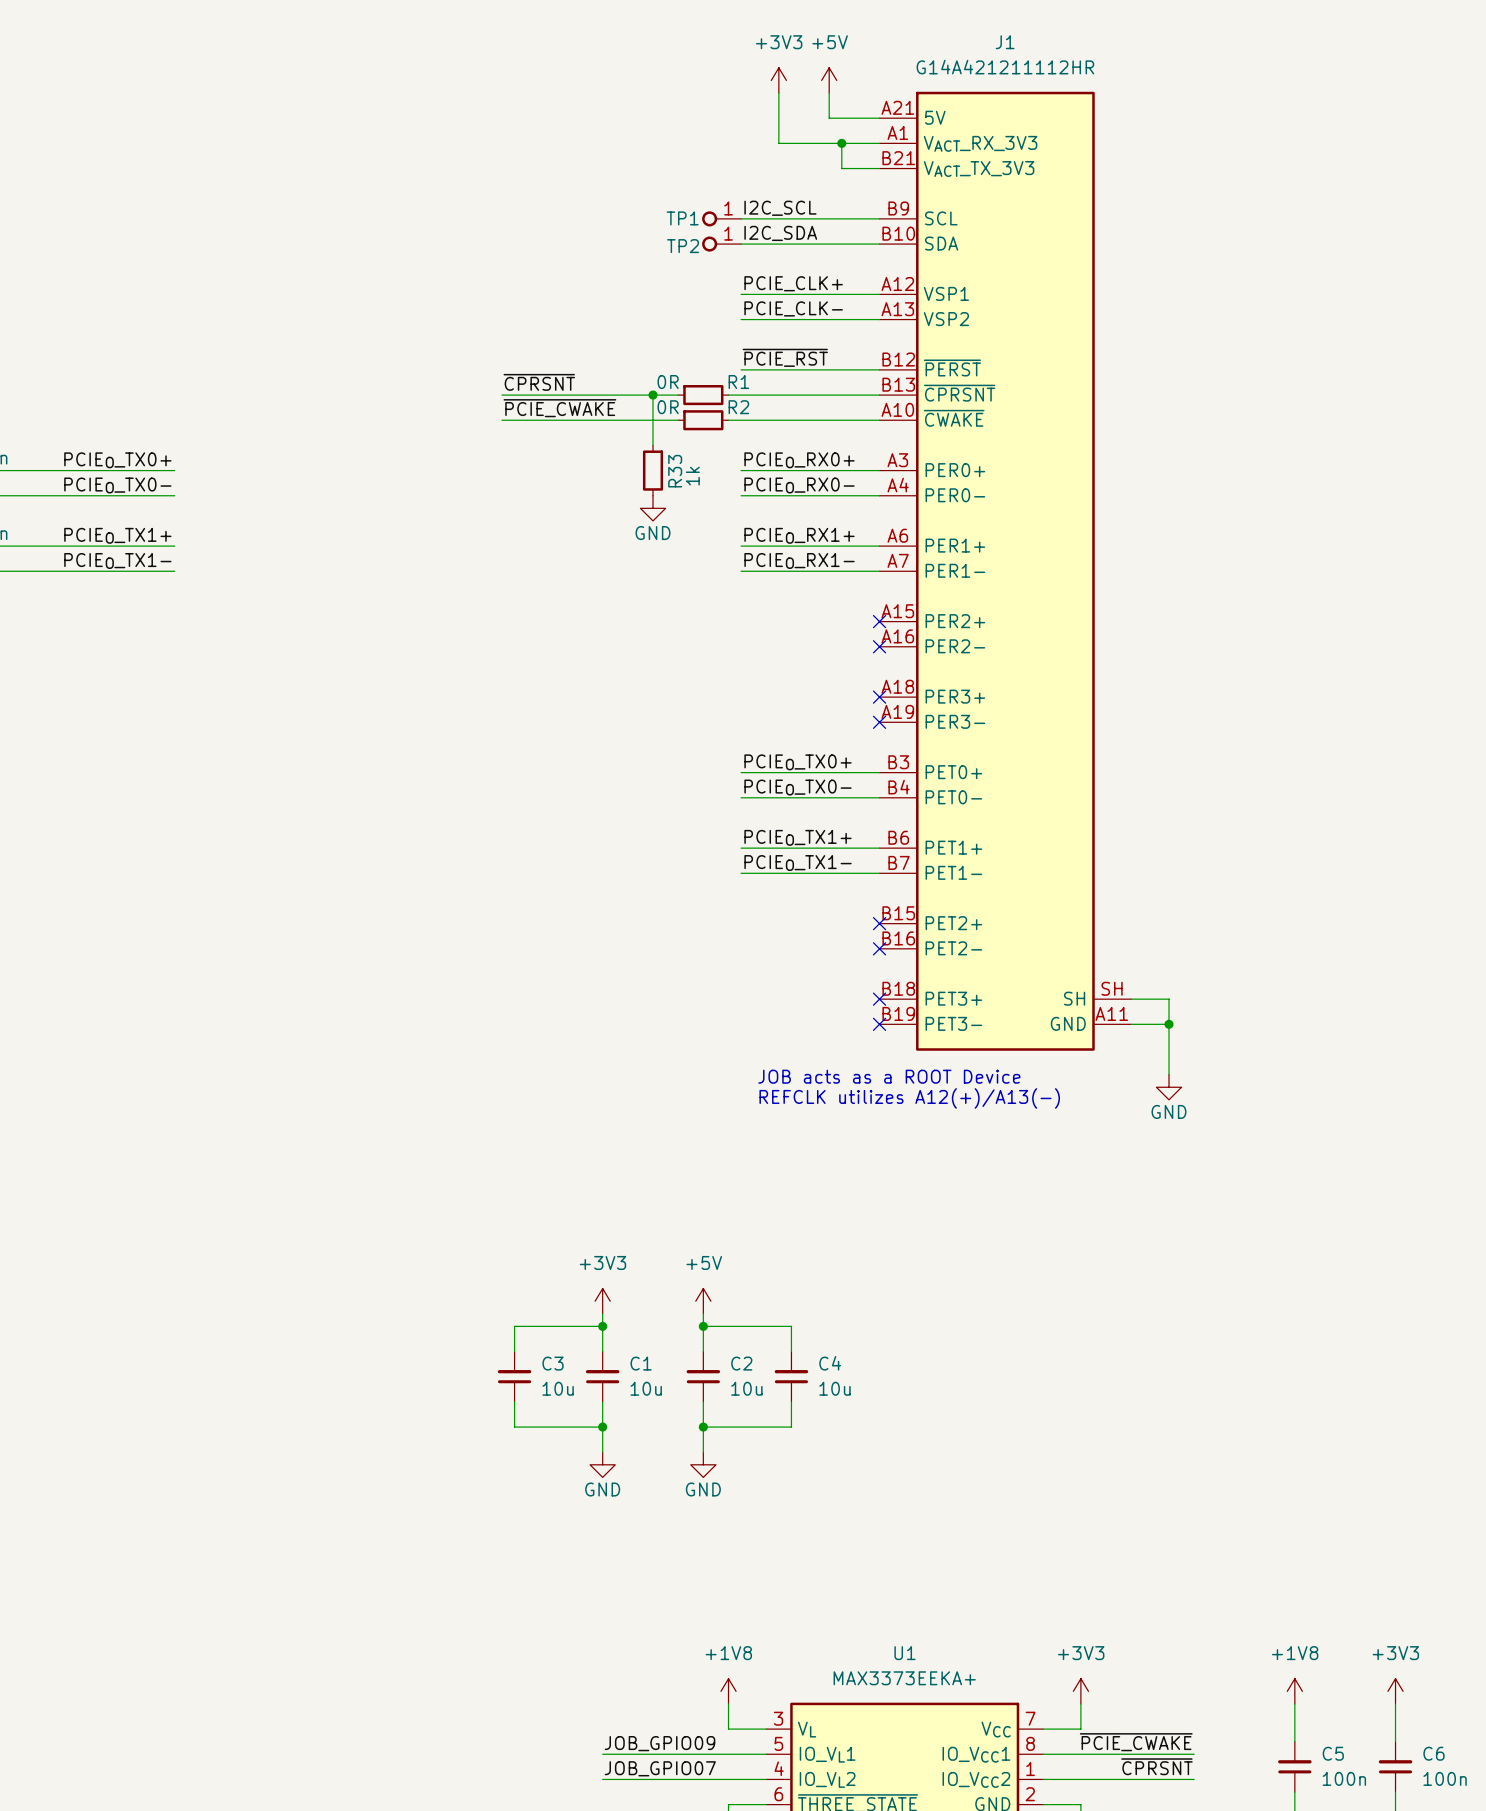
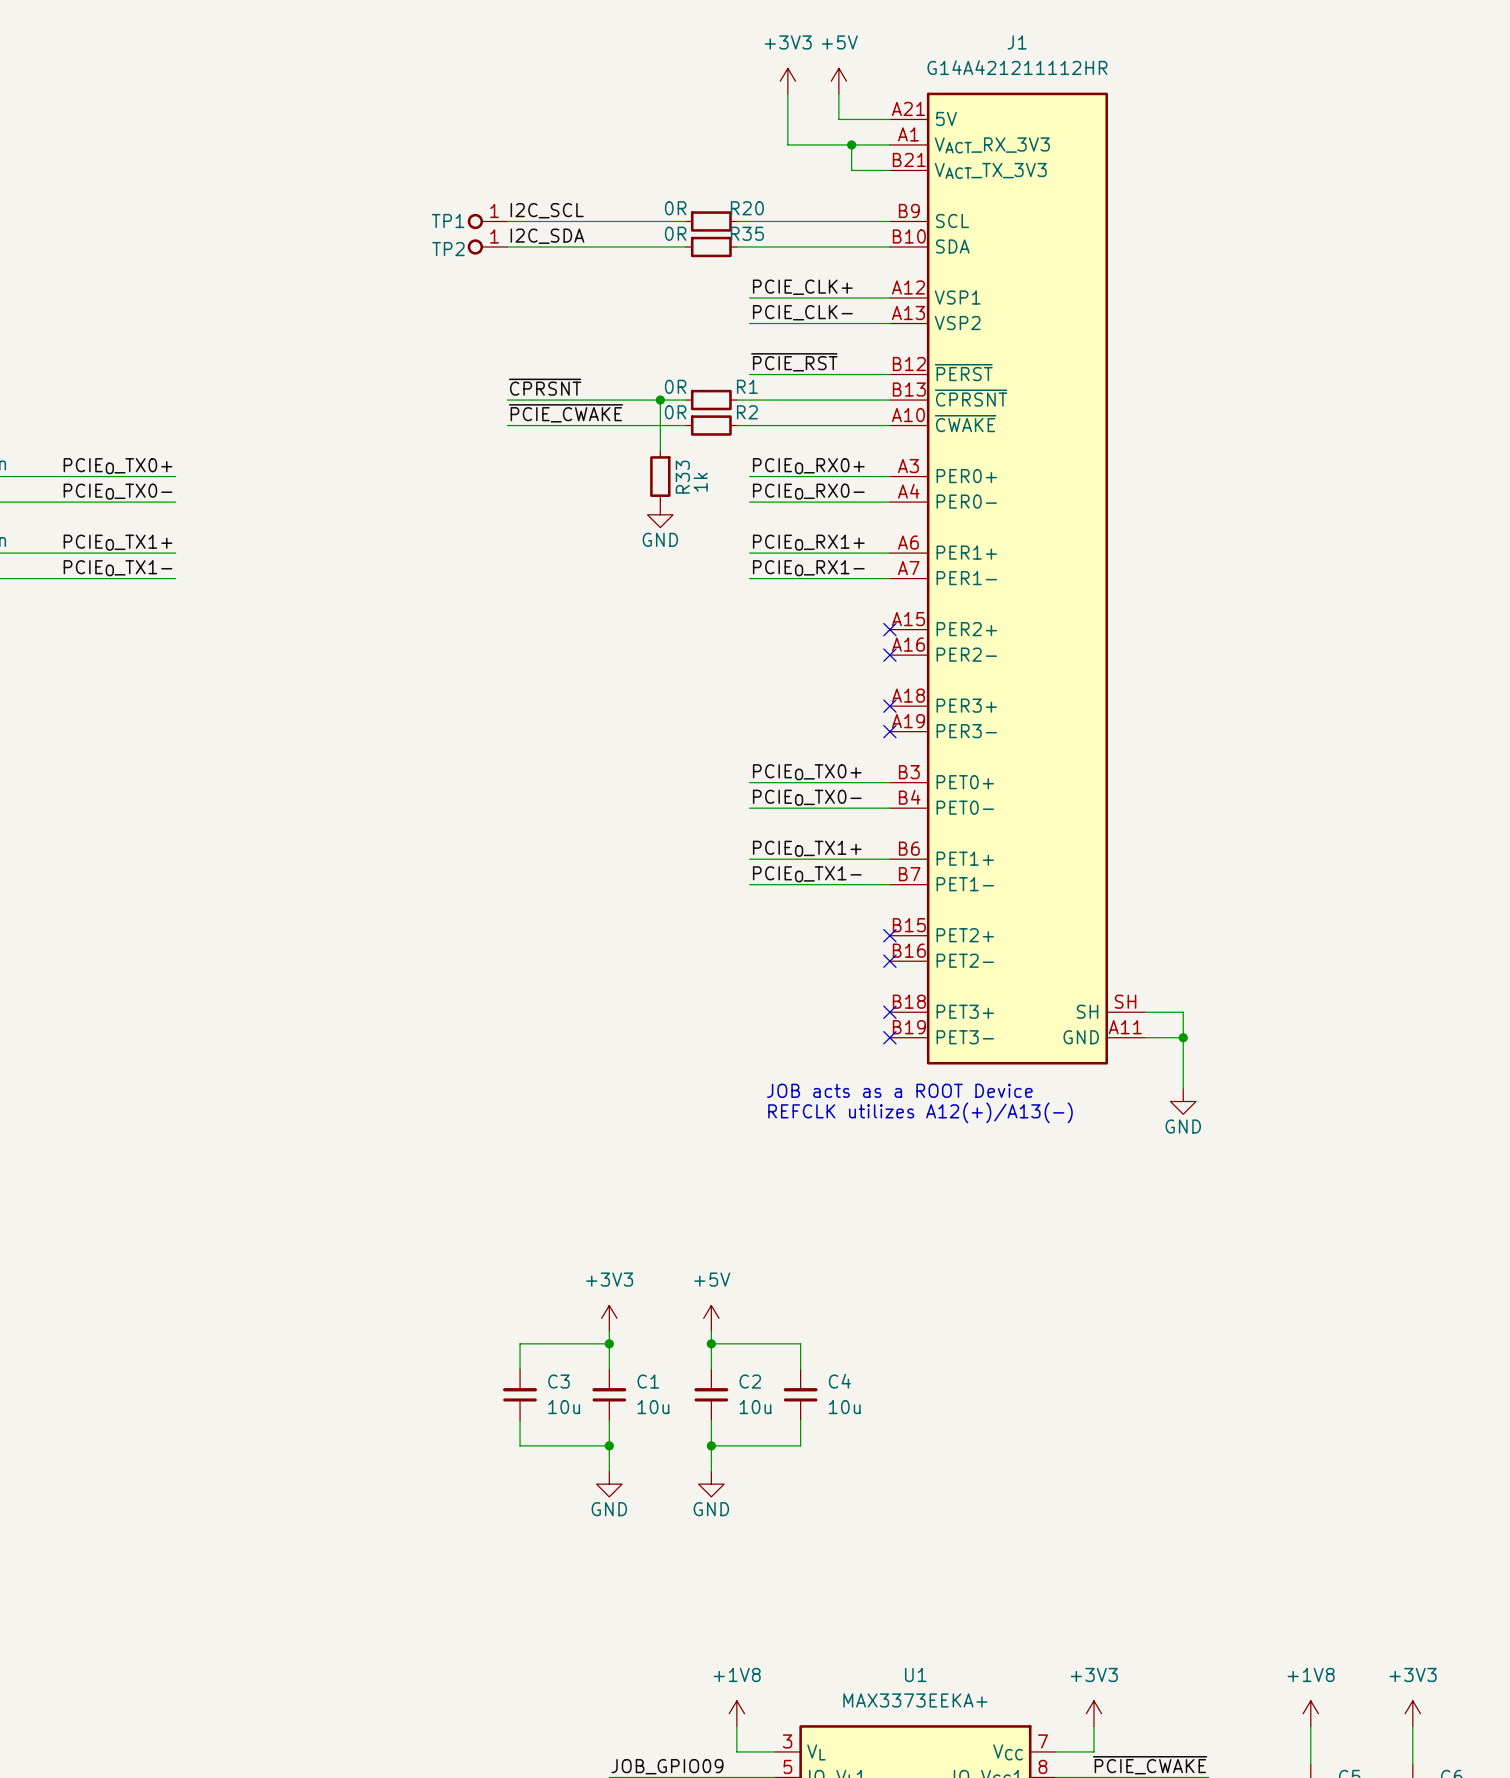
label position: I2C_SCL (780, 208) -> I2C_SCL (547, 210)
wire: none -> (507, 221) (685, 221)
R20: none -> (711, 221)
TP1 position: (721, 218) -> (487, 221)
label position: I2C_SDA (780, 233) -> I2C_SDA (547, 236)
wire: none -> (507, 246) (685, 246)
R35: none -> (711, 246)
TP2 position: (721, 244) -> (487, 246)

